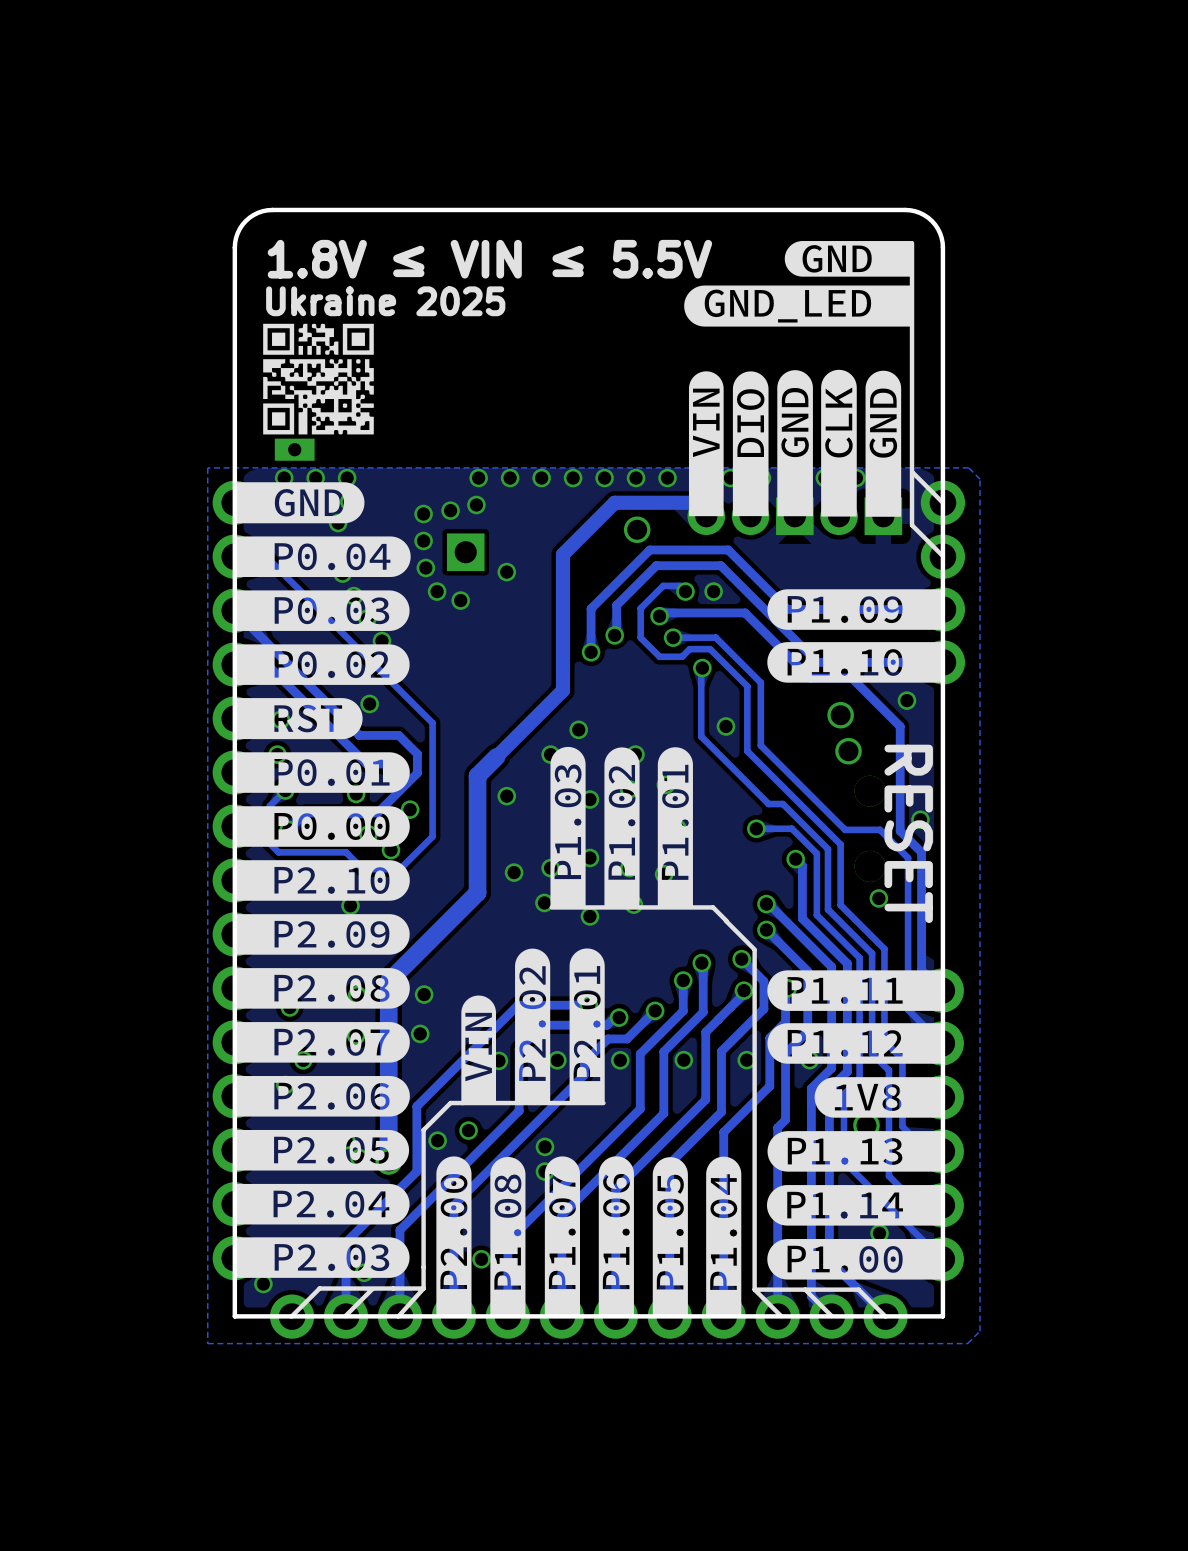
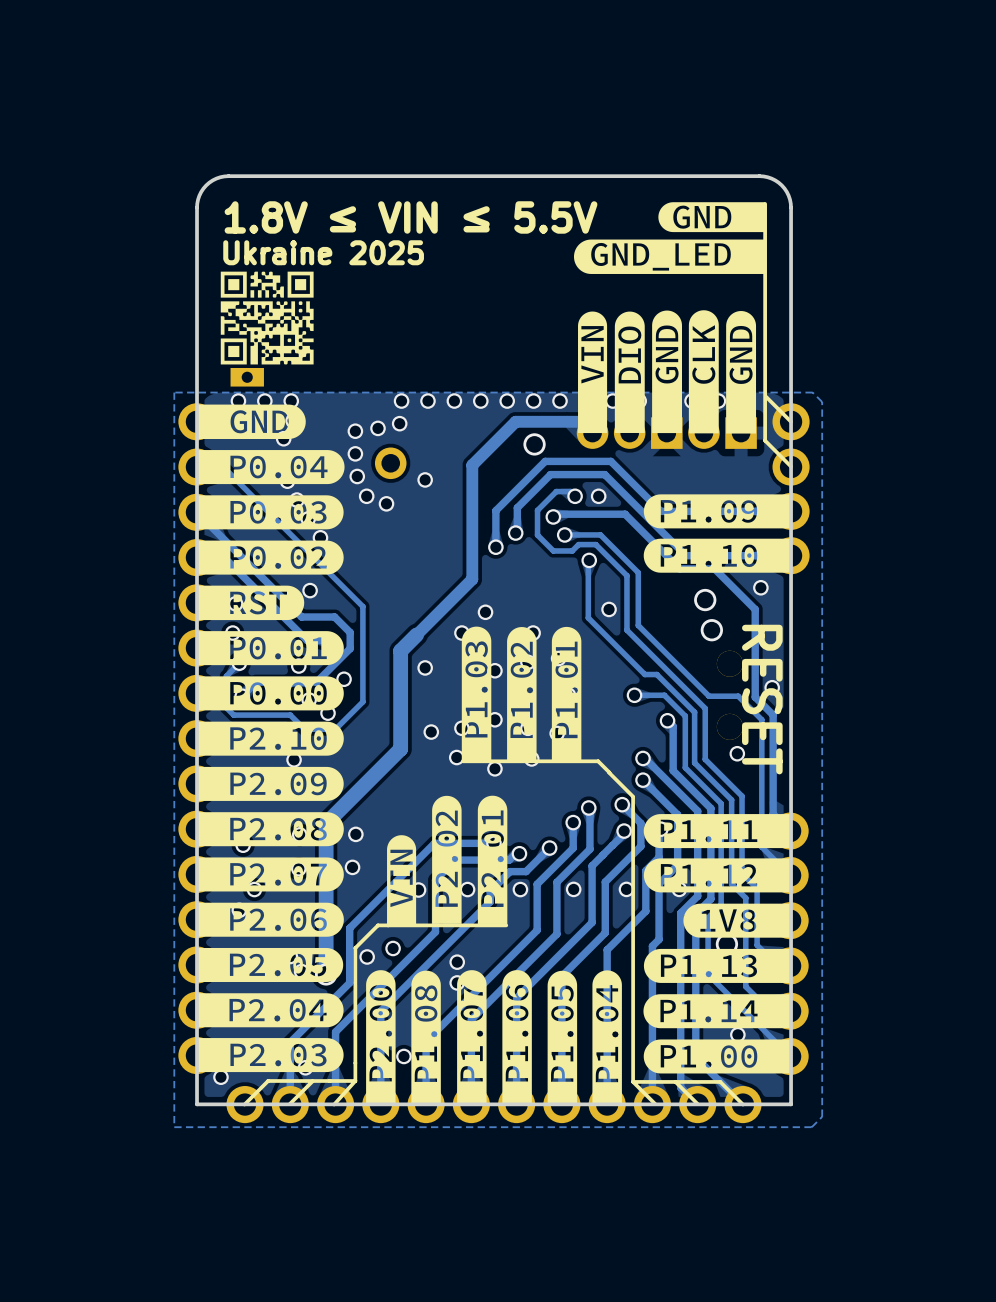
part footprint: [446, 533, 485, 572] -> [374, 447, 407, 480]

